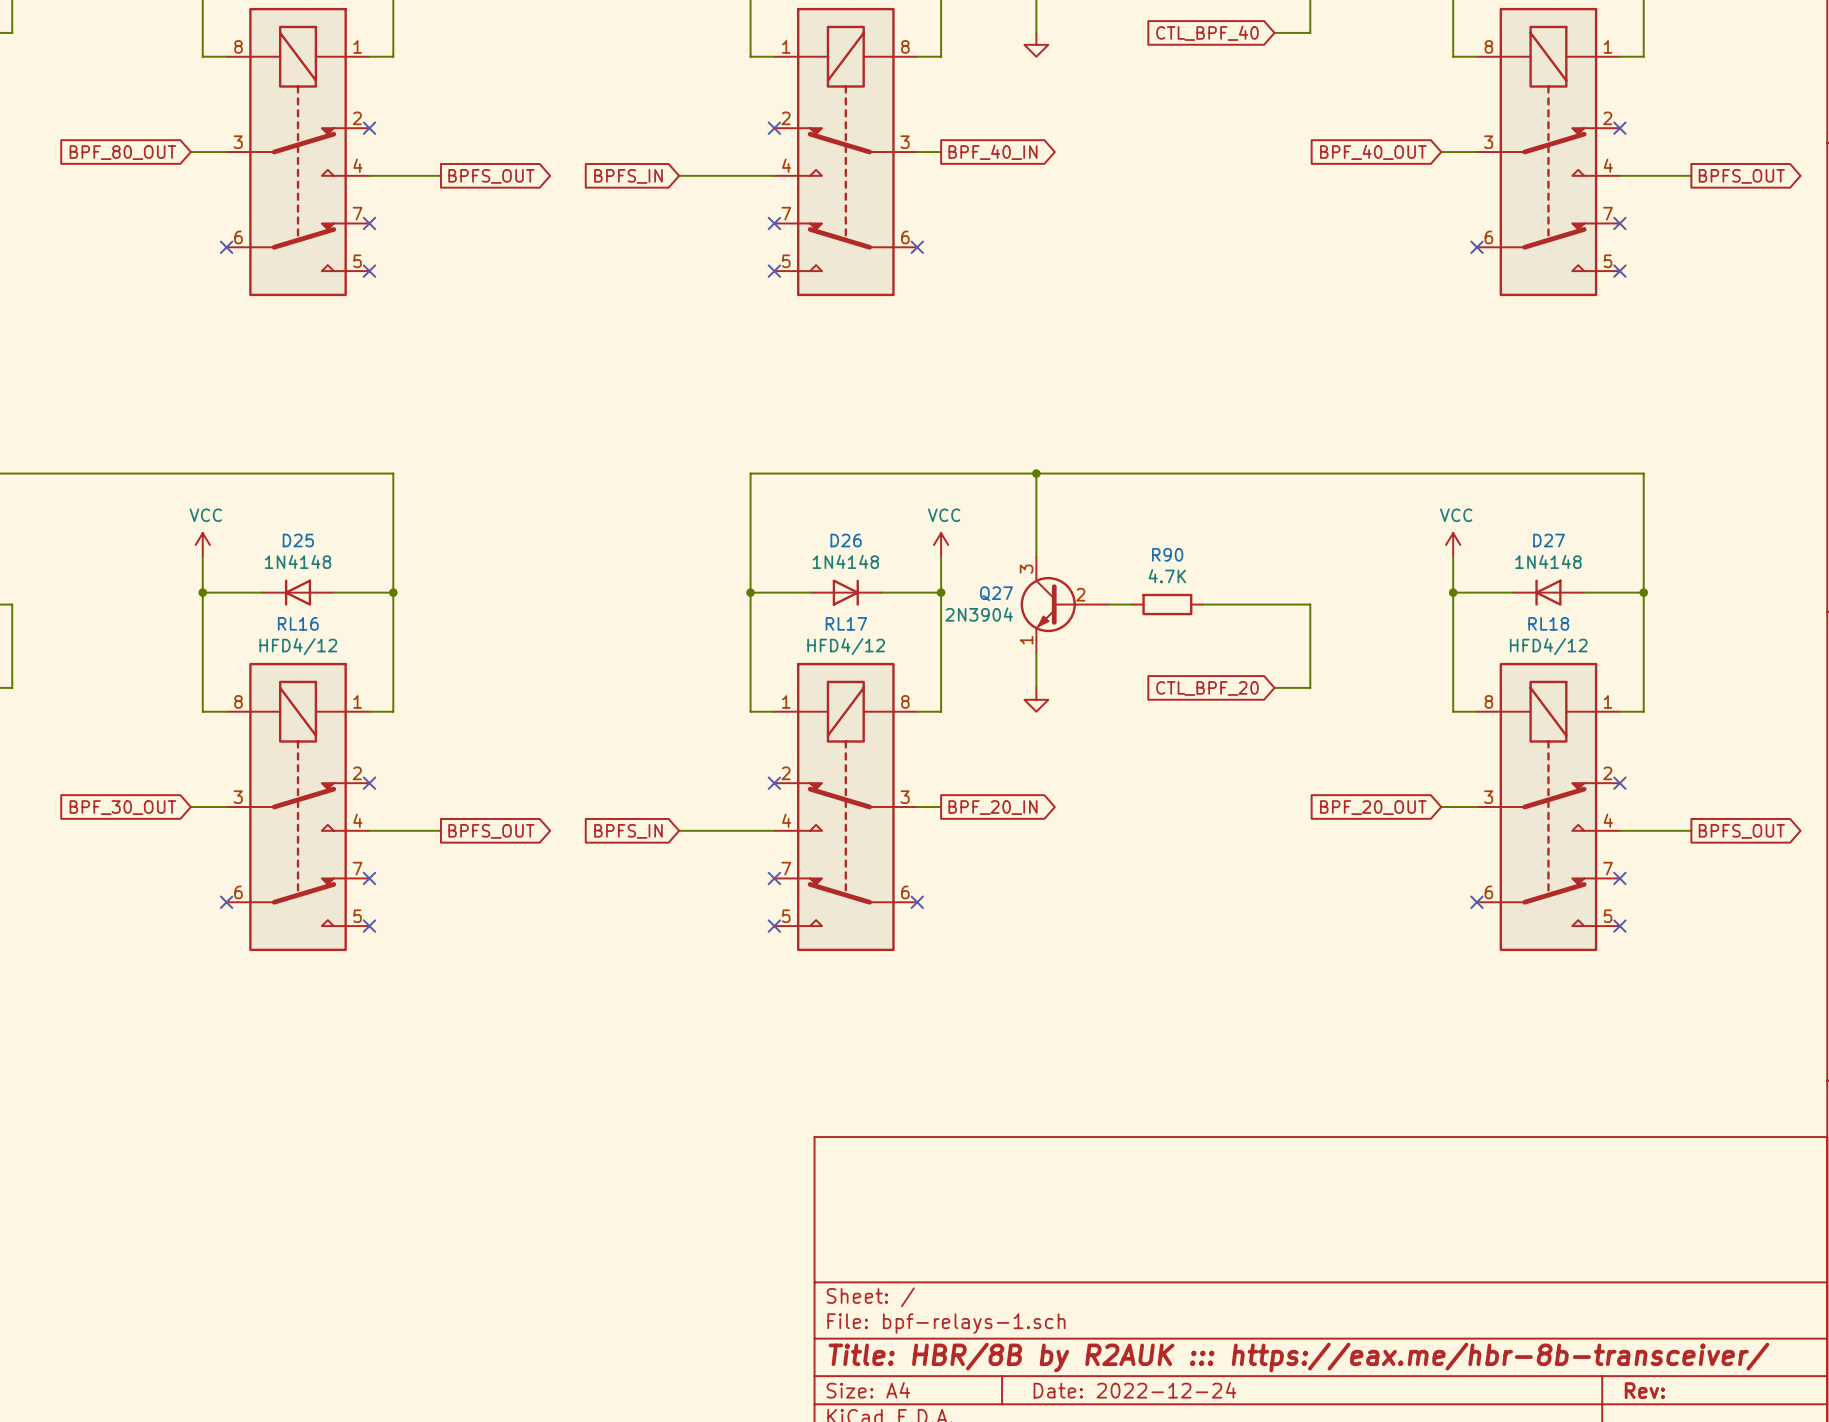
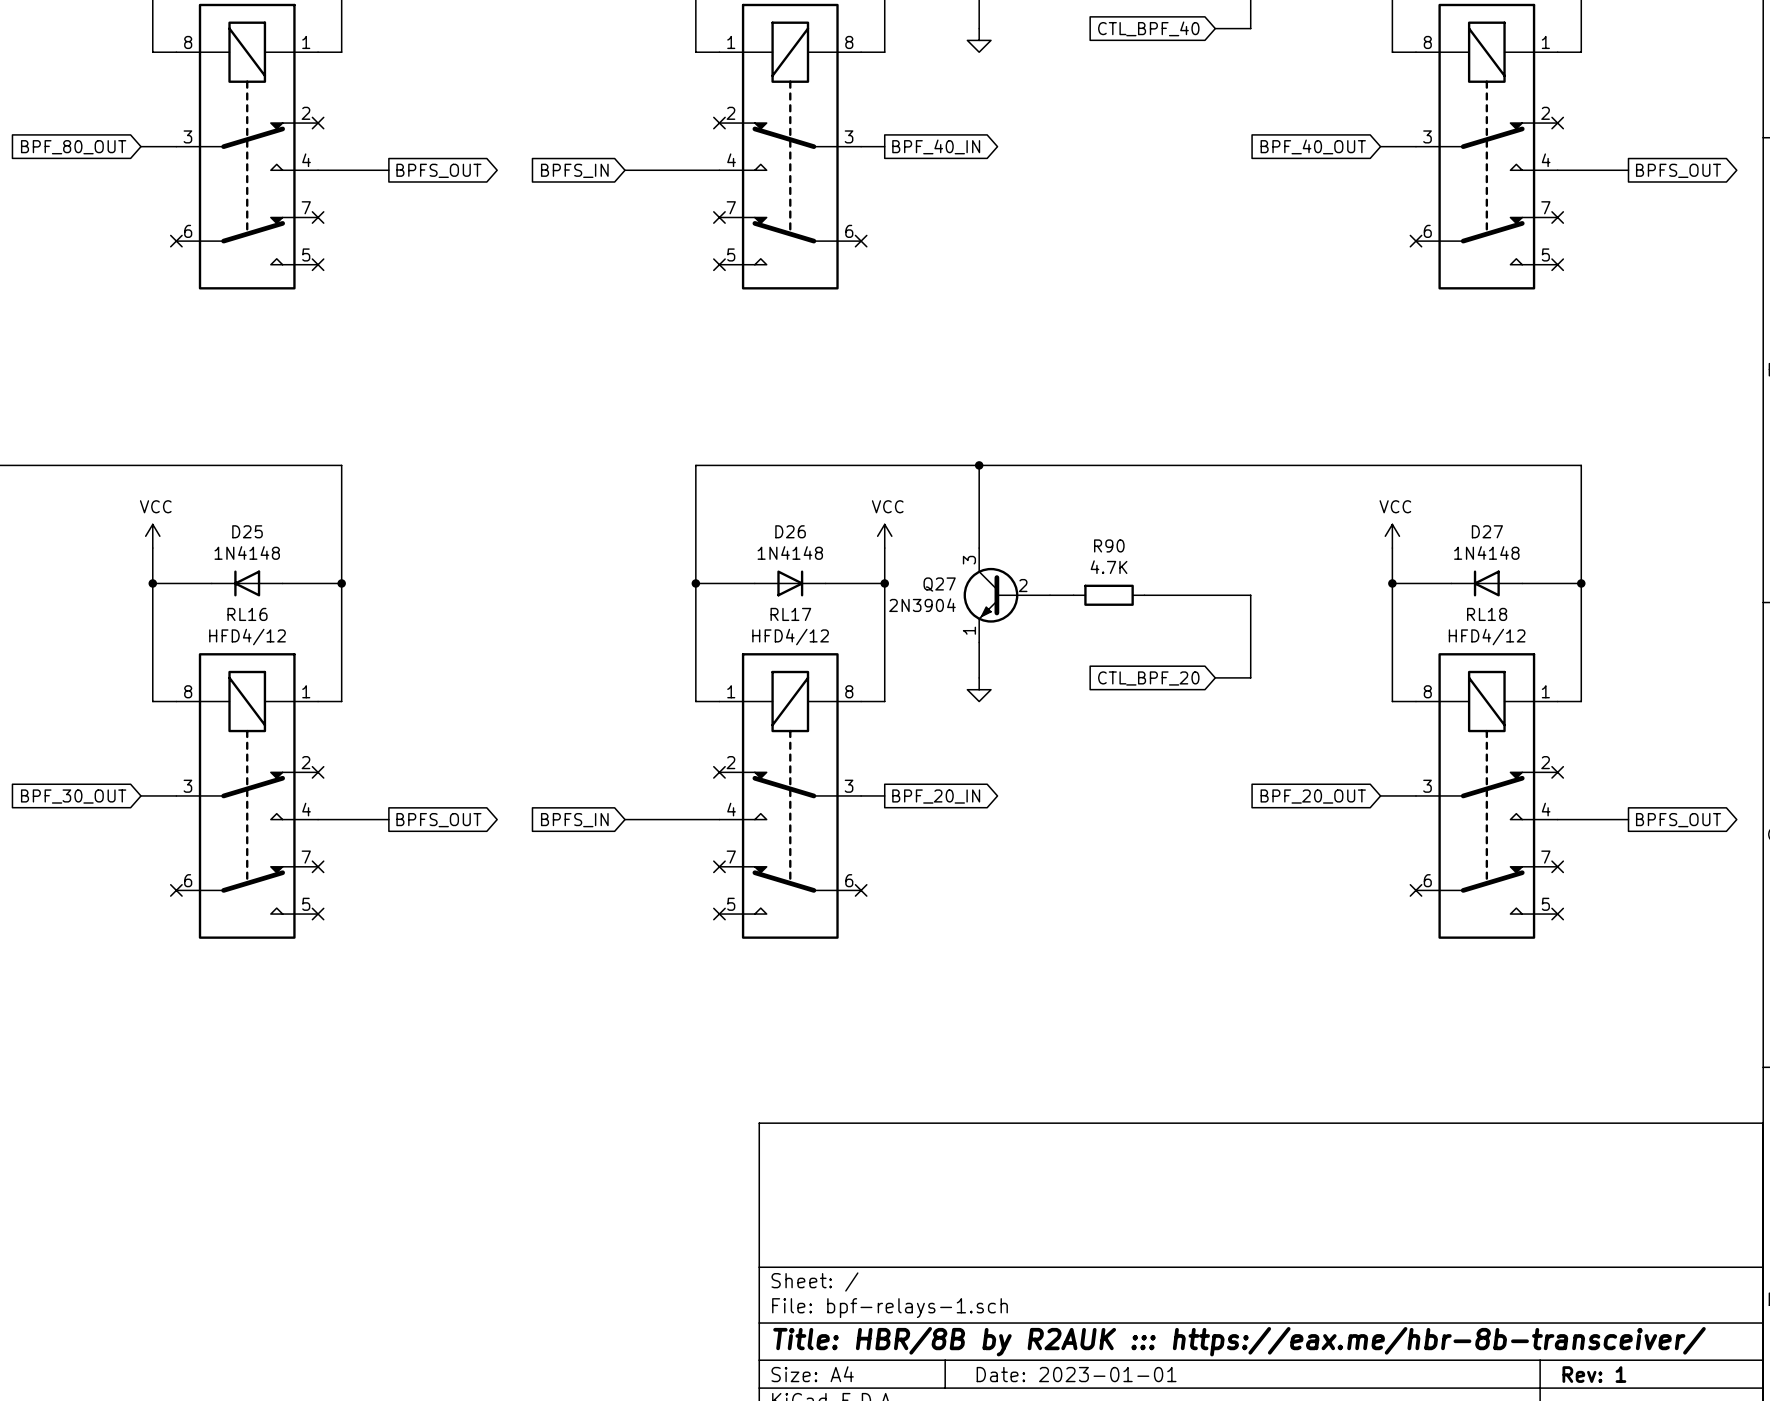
title block: Date: 2022-12-24 (1134, 1390) -> Date: 2023-01-01 (1076, 1374)
title block: Rev: (1644, 1390) -> Rev: 1 (1594, 1374)

